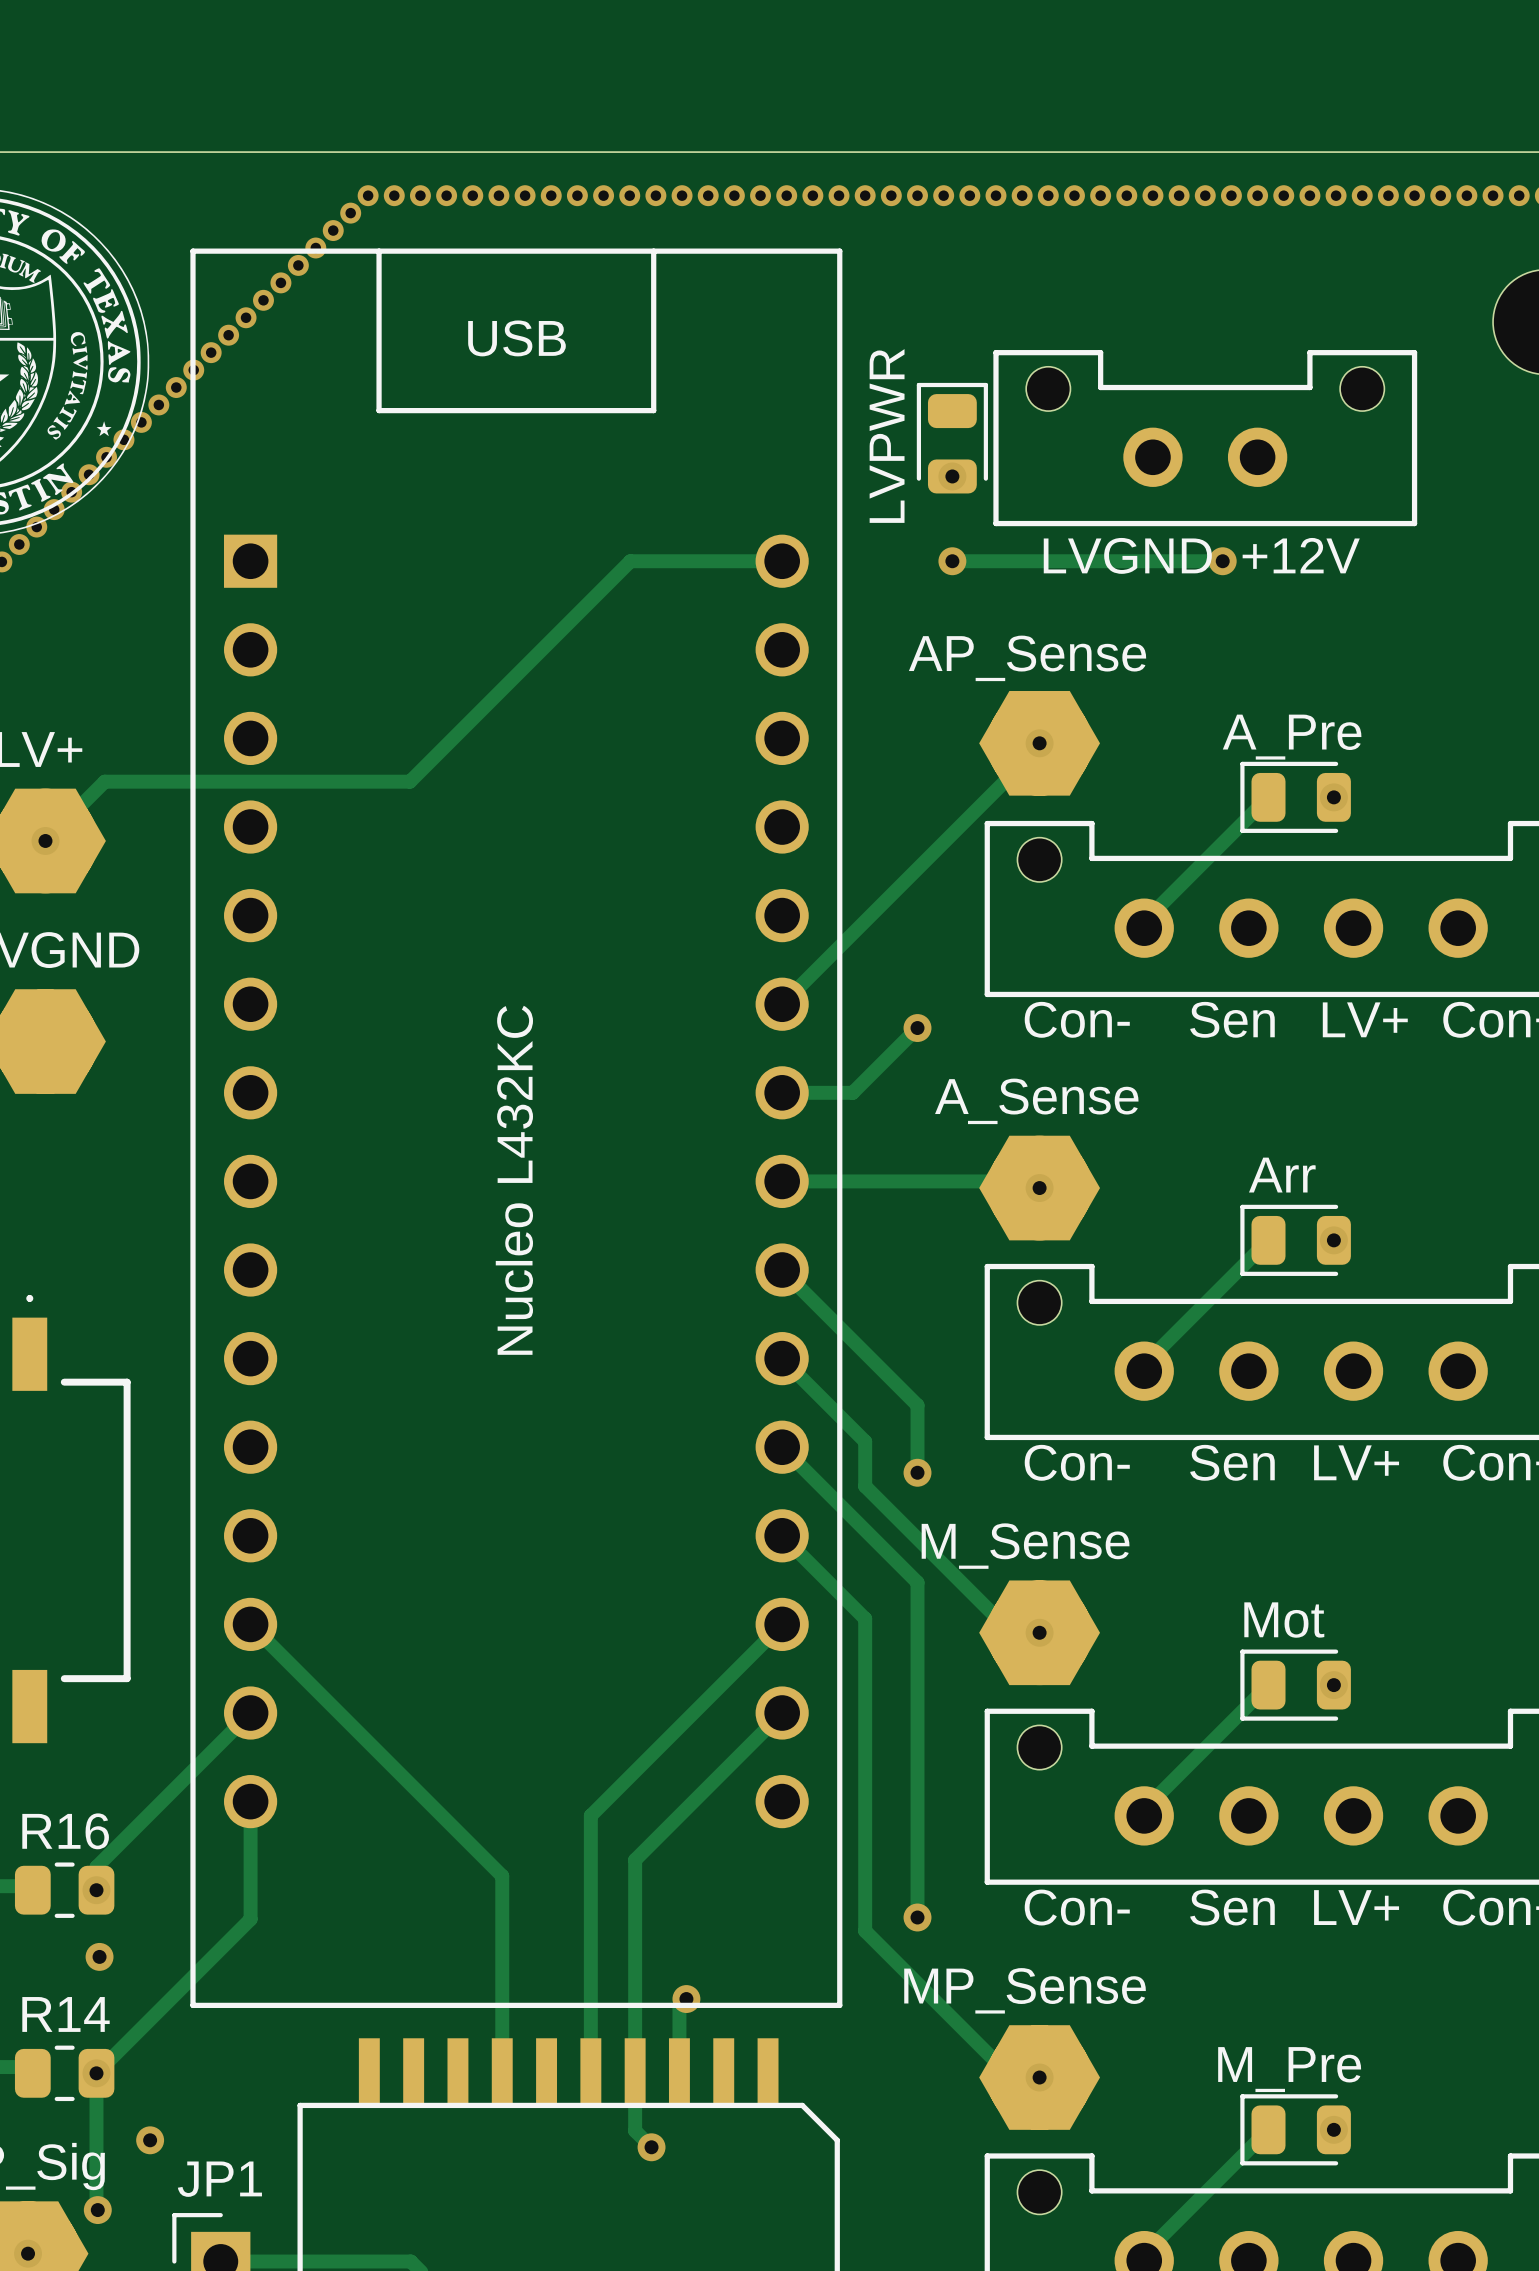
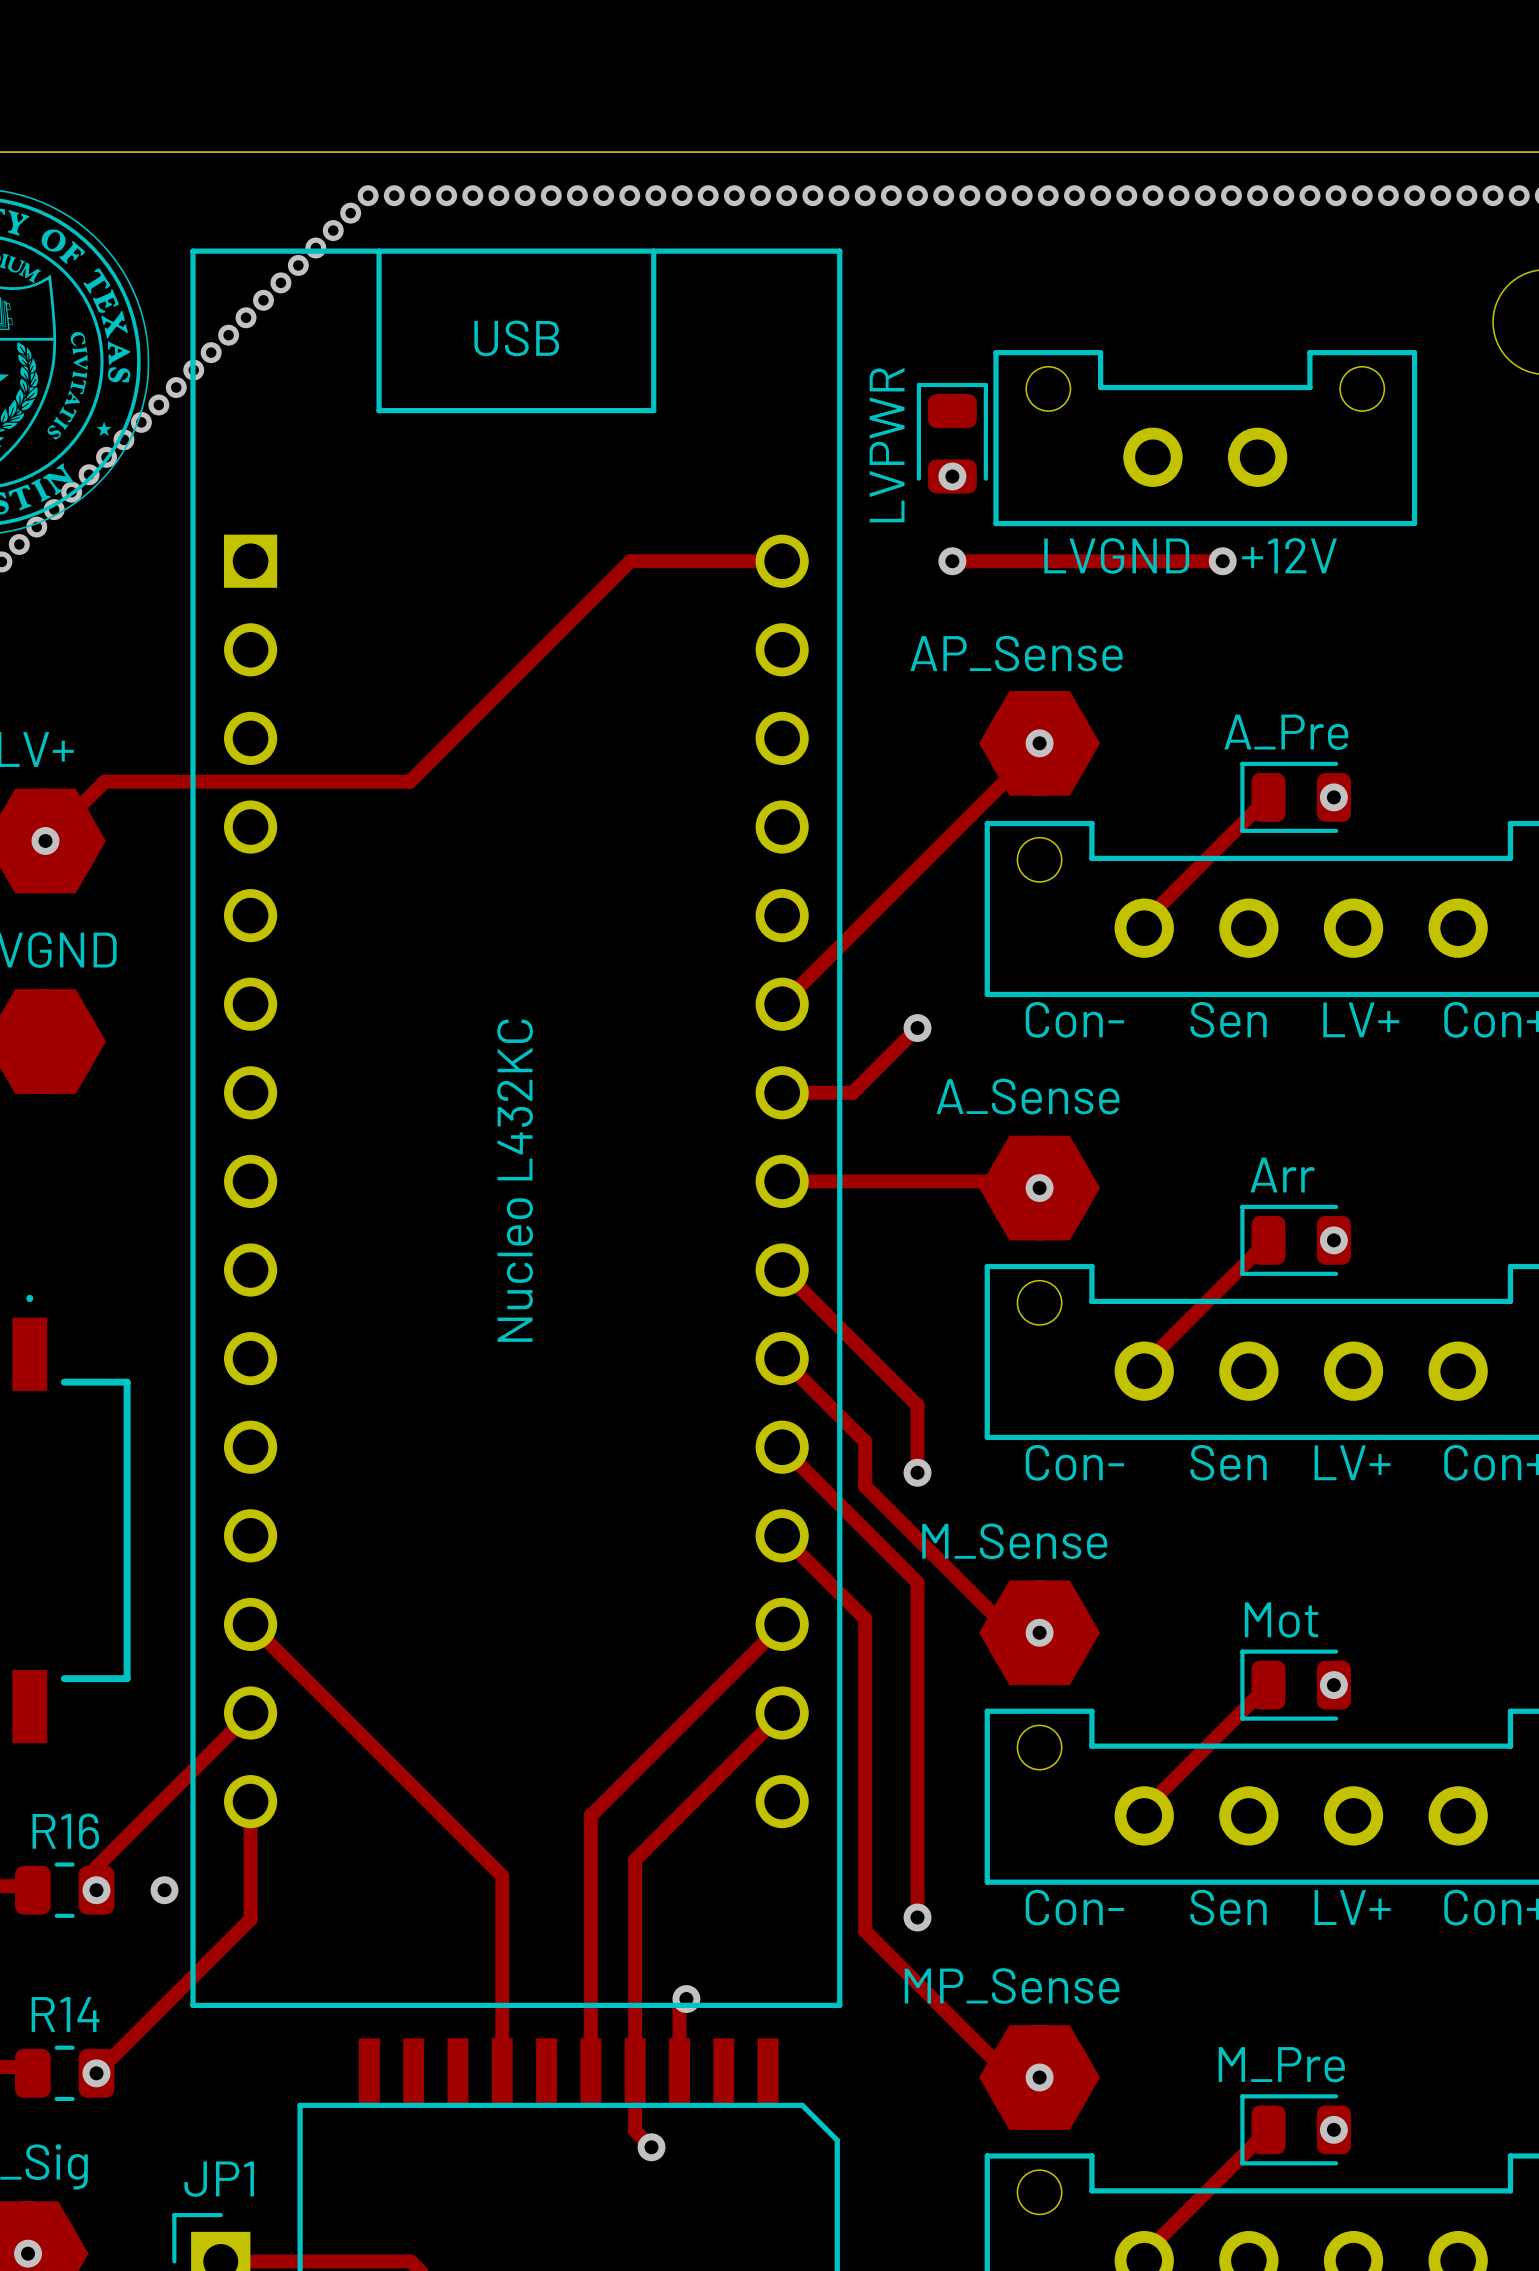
via position: (99, 1956) -> (164, 1890)
track: (96, 2073) (97, 2210) -> none
via: (150, 2140) -> none
via: (97, 2210) -> none

